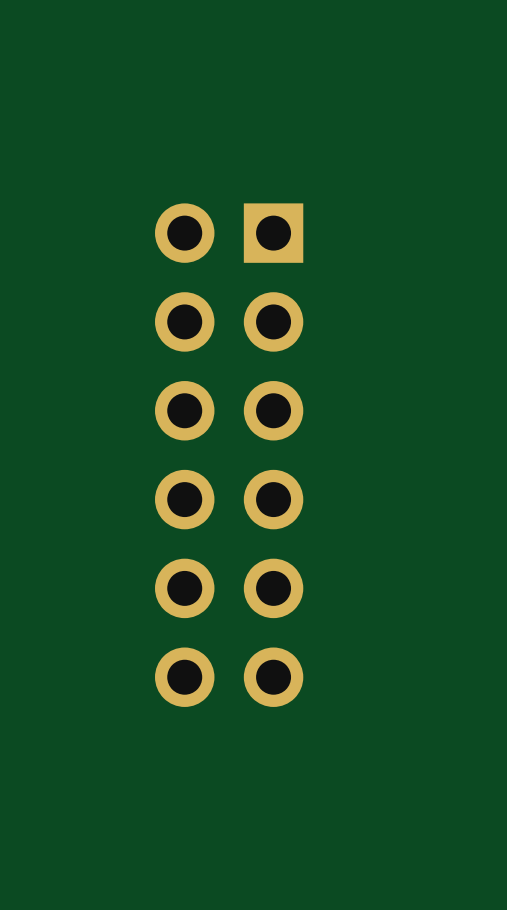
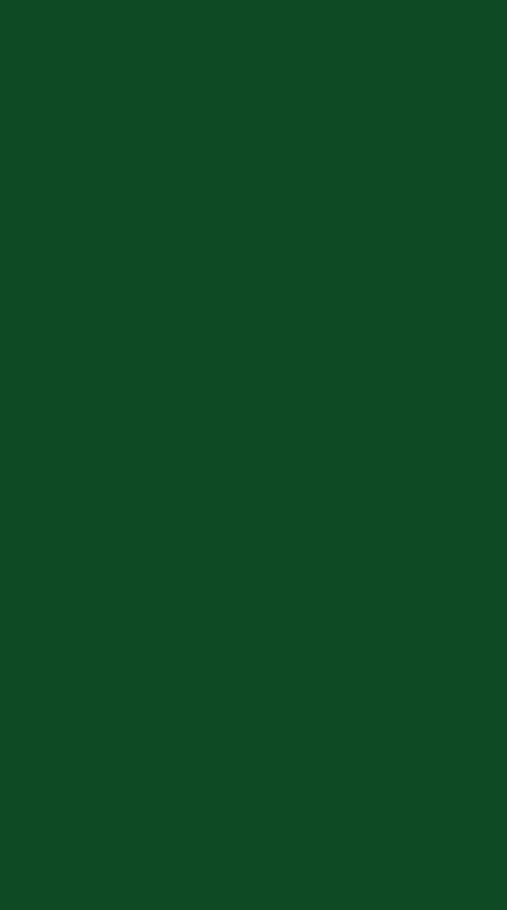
part: (229, 455) -> none

